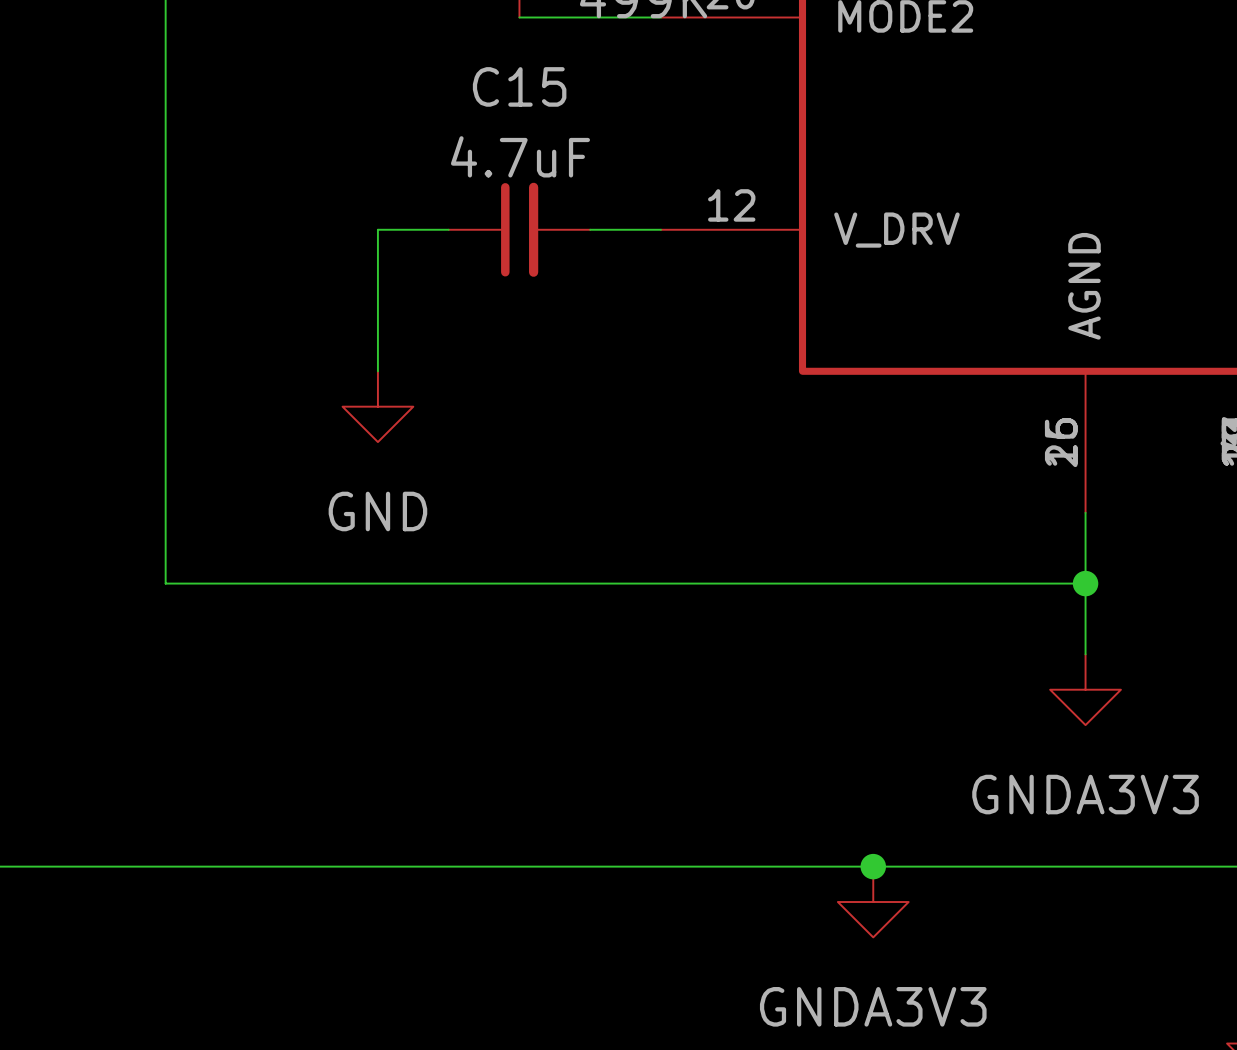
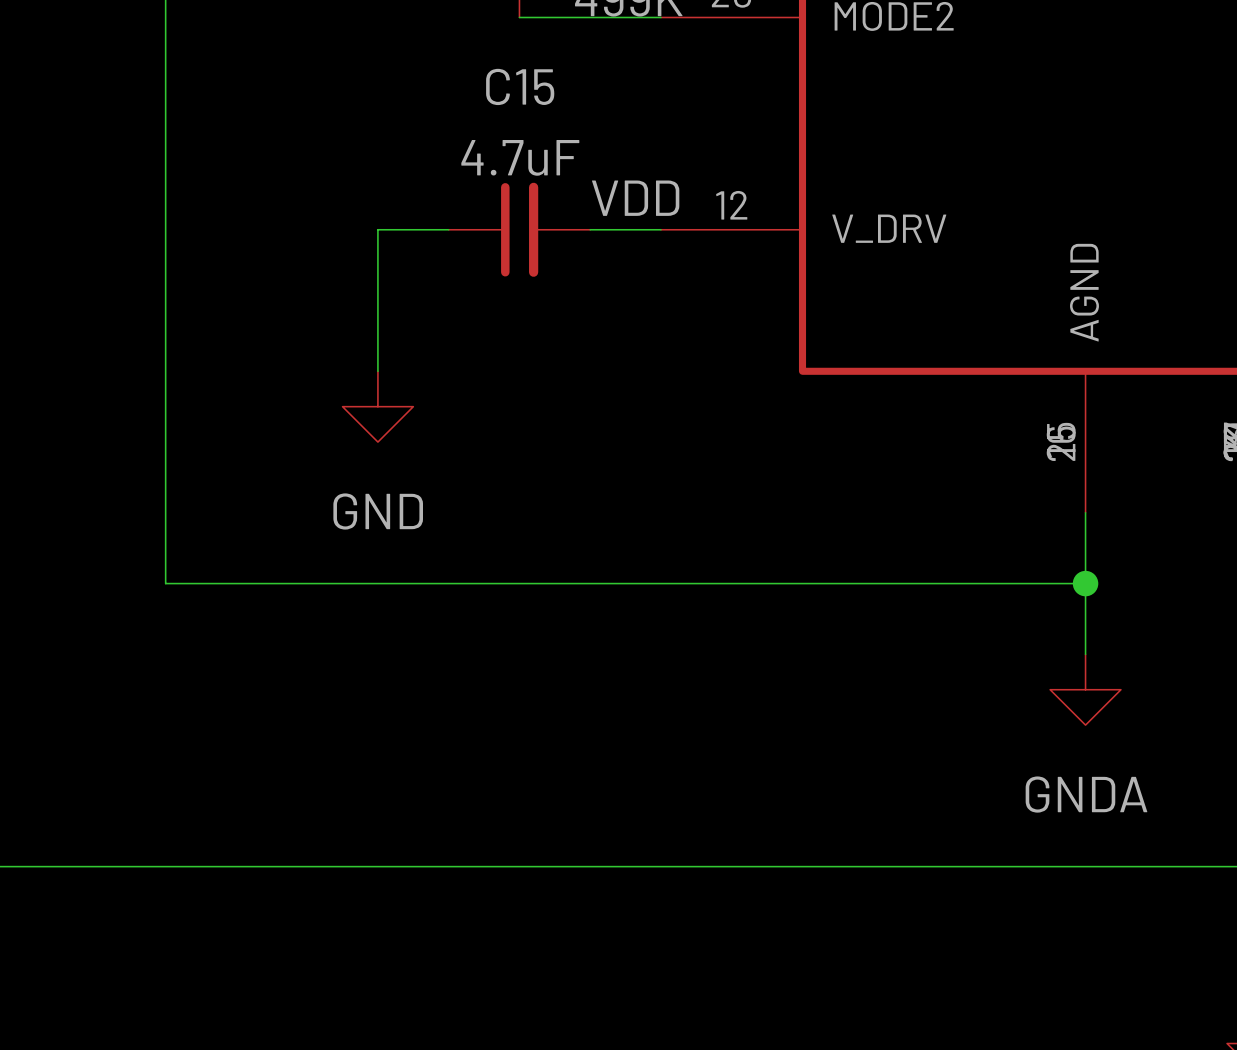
label: none -> VDD (635, 198)
power symbol: GNDA3V3 (1085, 689) -> GNDA (1085, 689)
junction: (873, 866) -> none
power symbol: GNDA3V3 (873, 902) -> none

